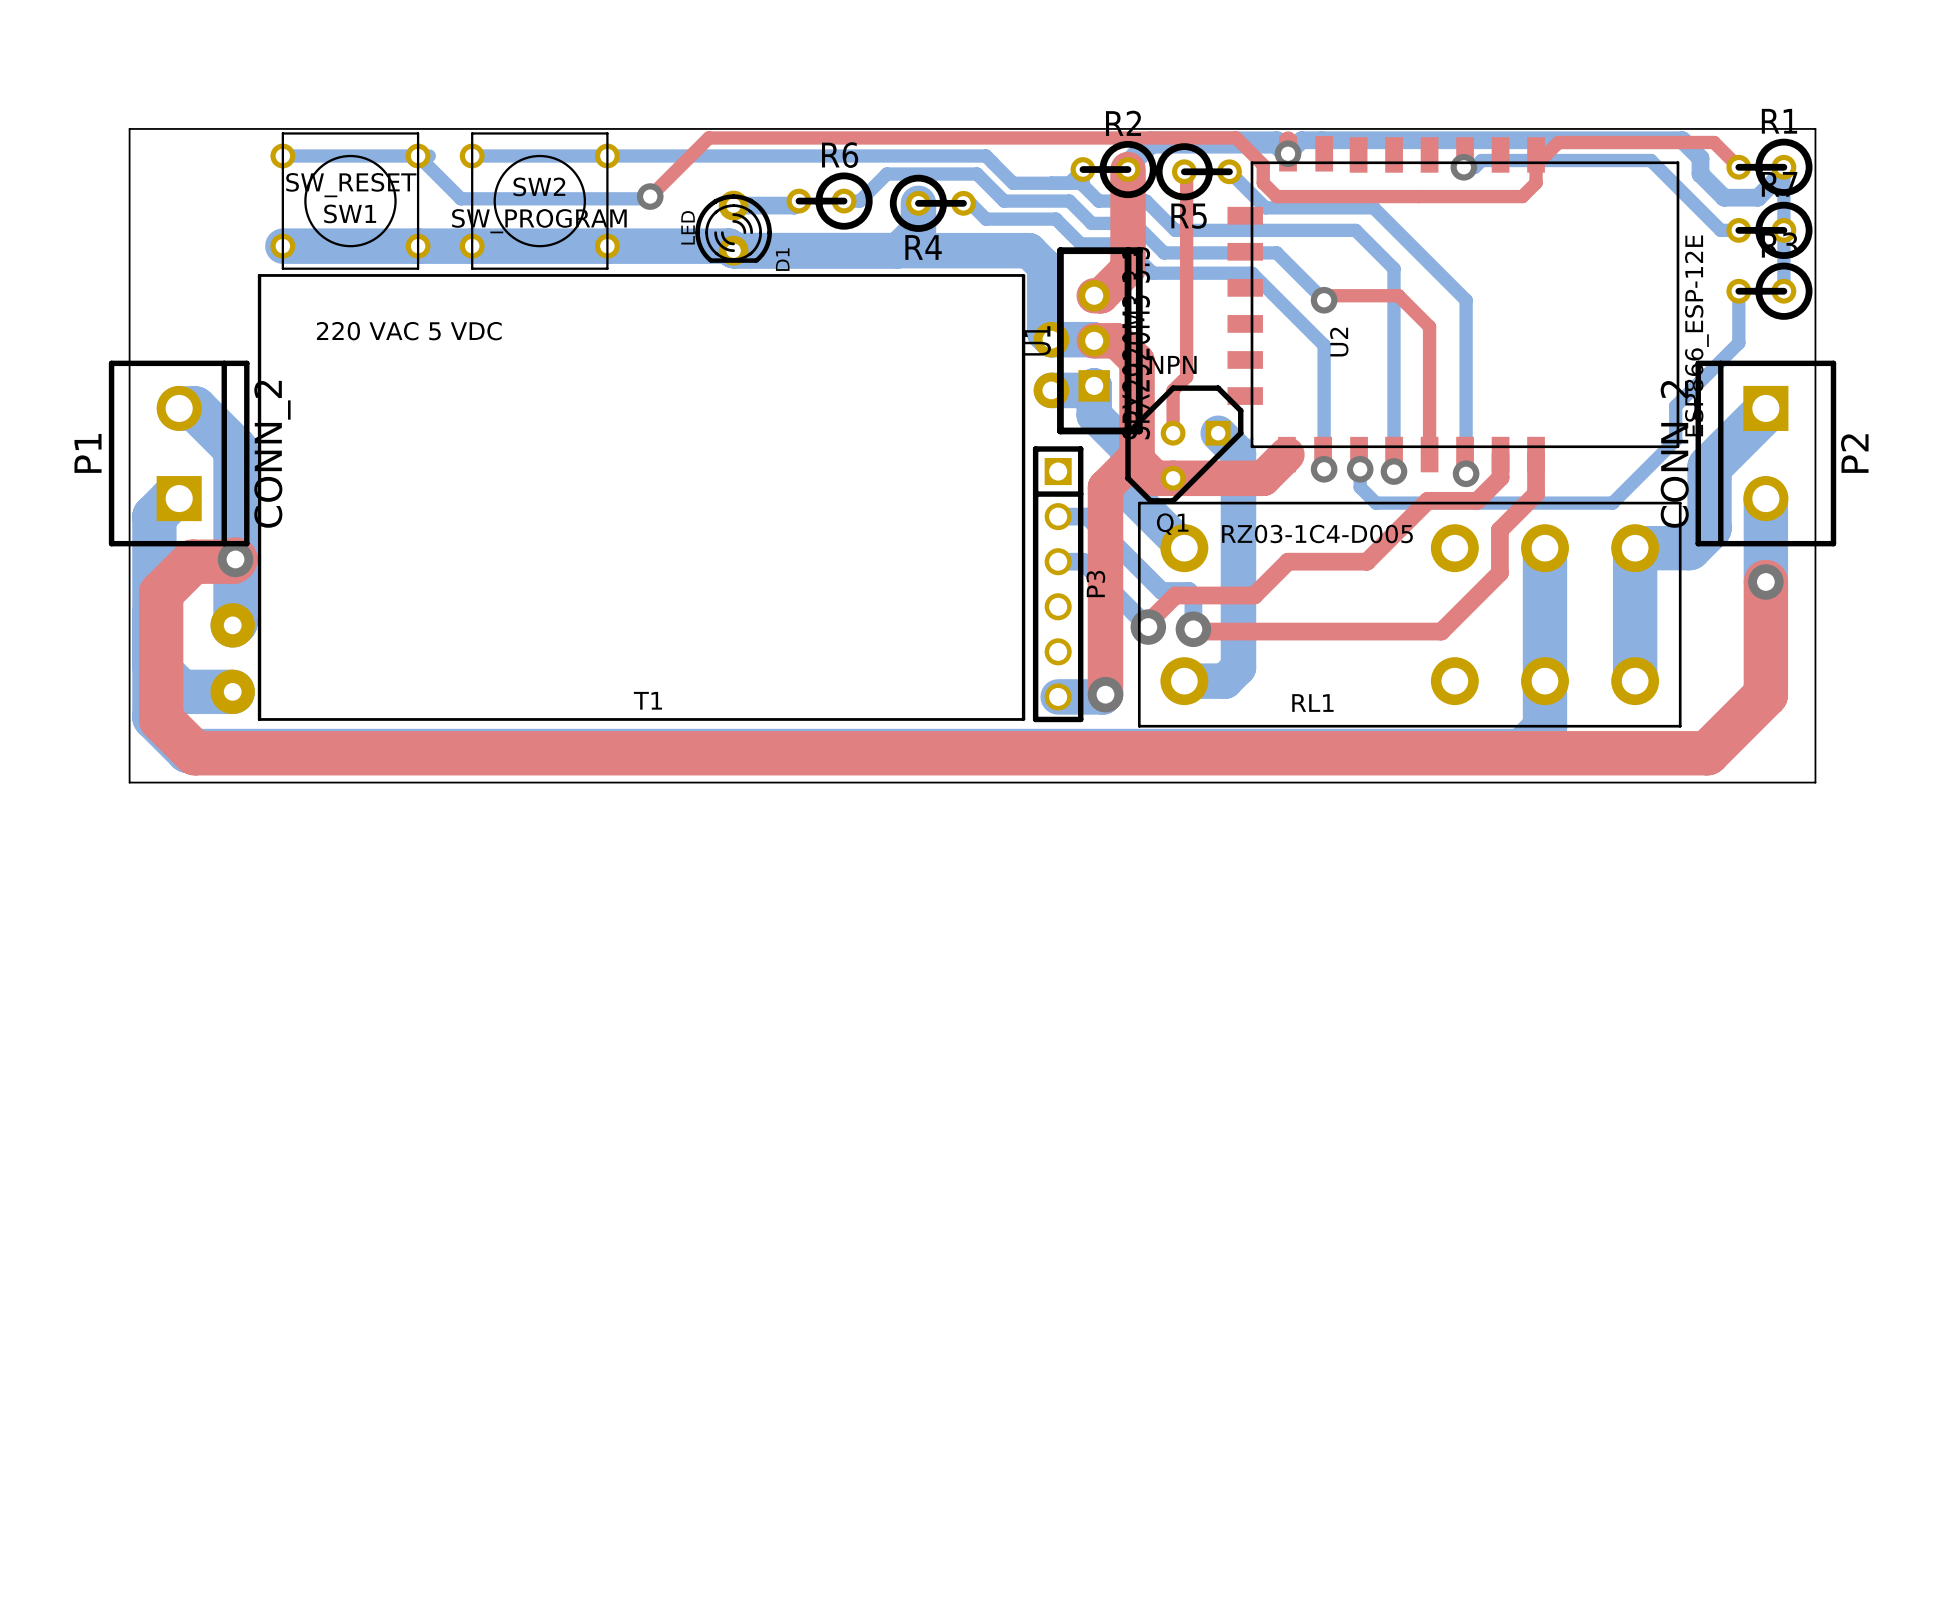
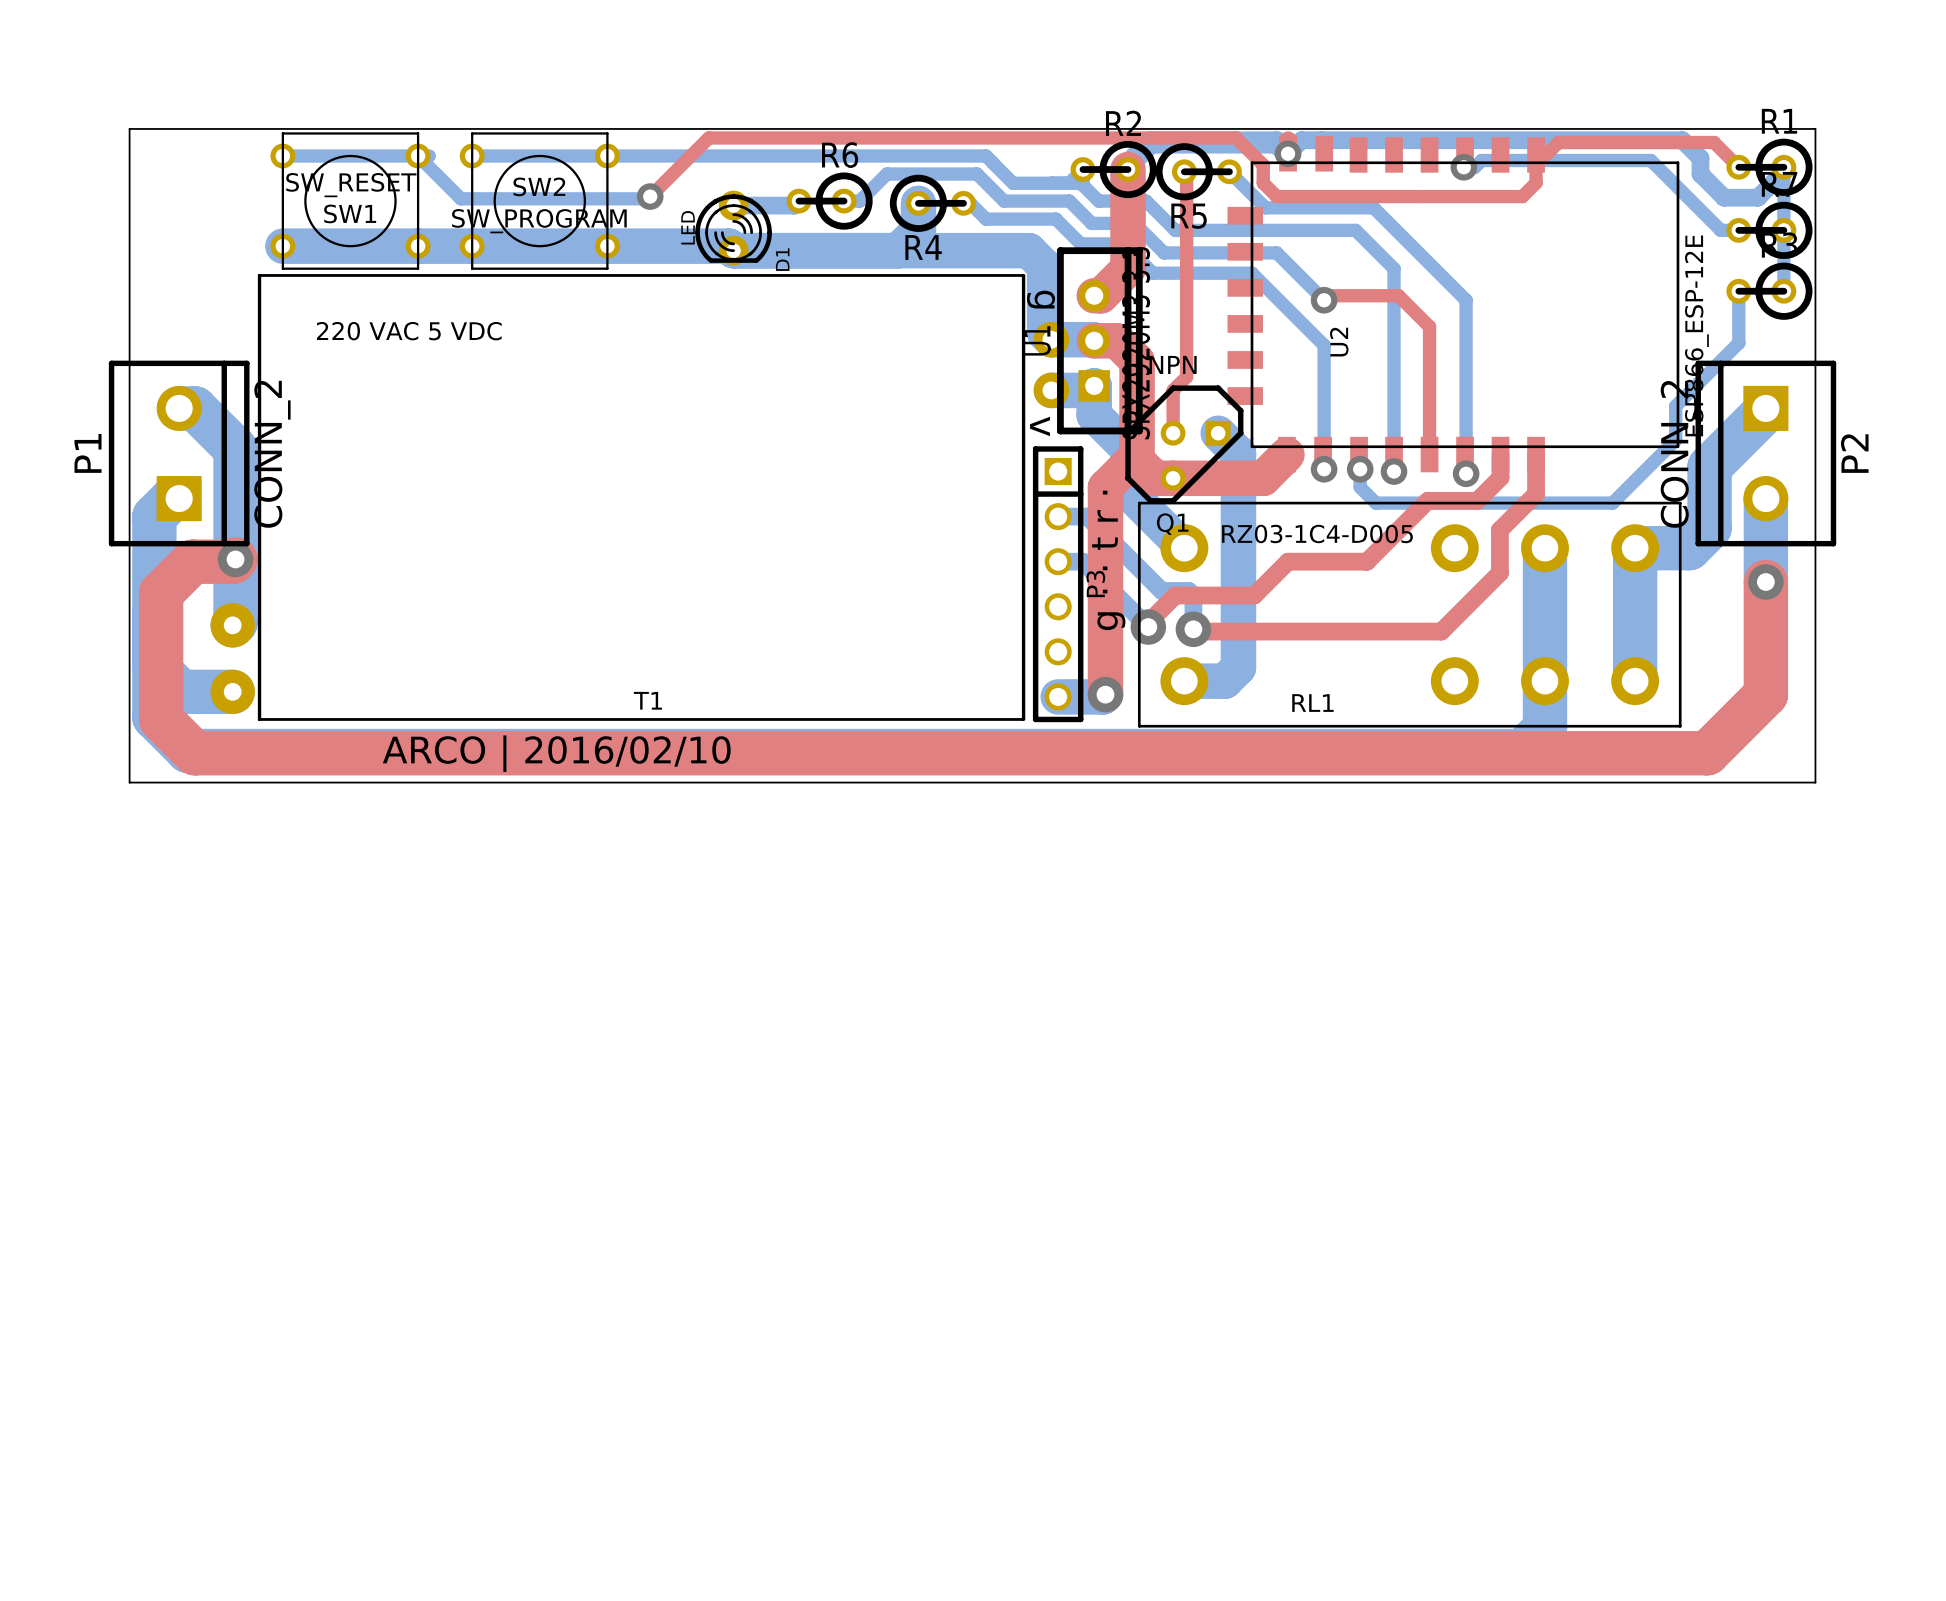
text: none -> g (1041, 299)
text: none -> v (1040, 426)
text: none -> g · · t r · (1108, 560)
text: none -> ARCO | 2016/02/10 (556, 753)

